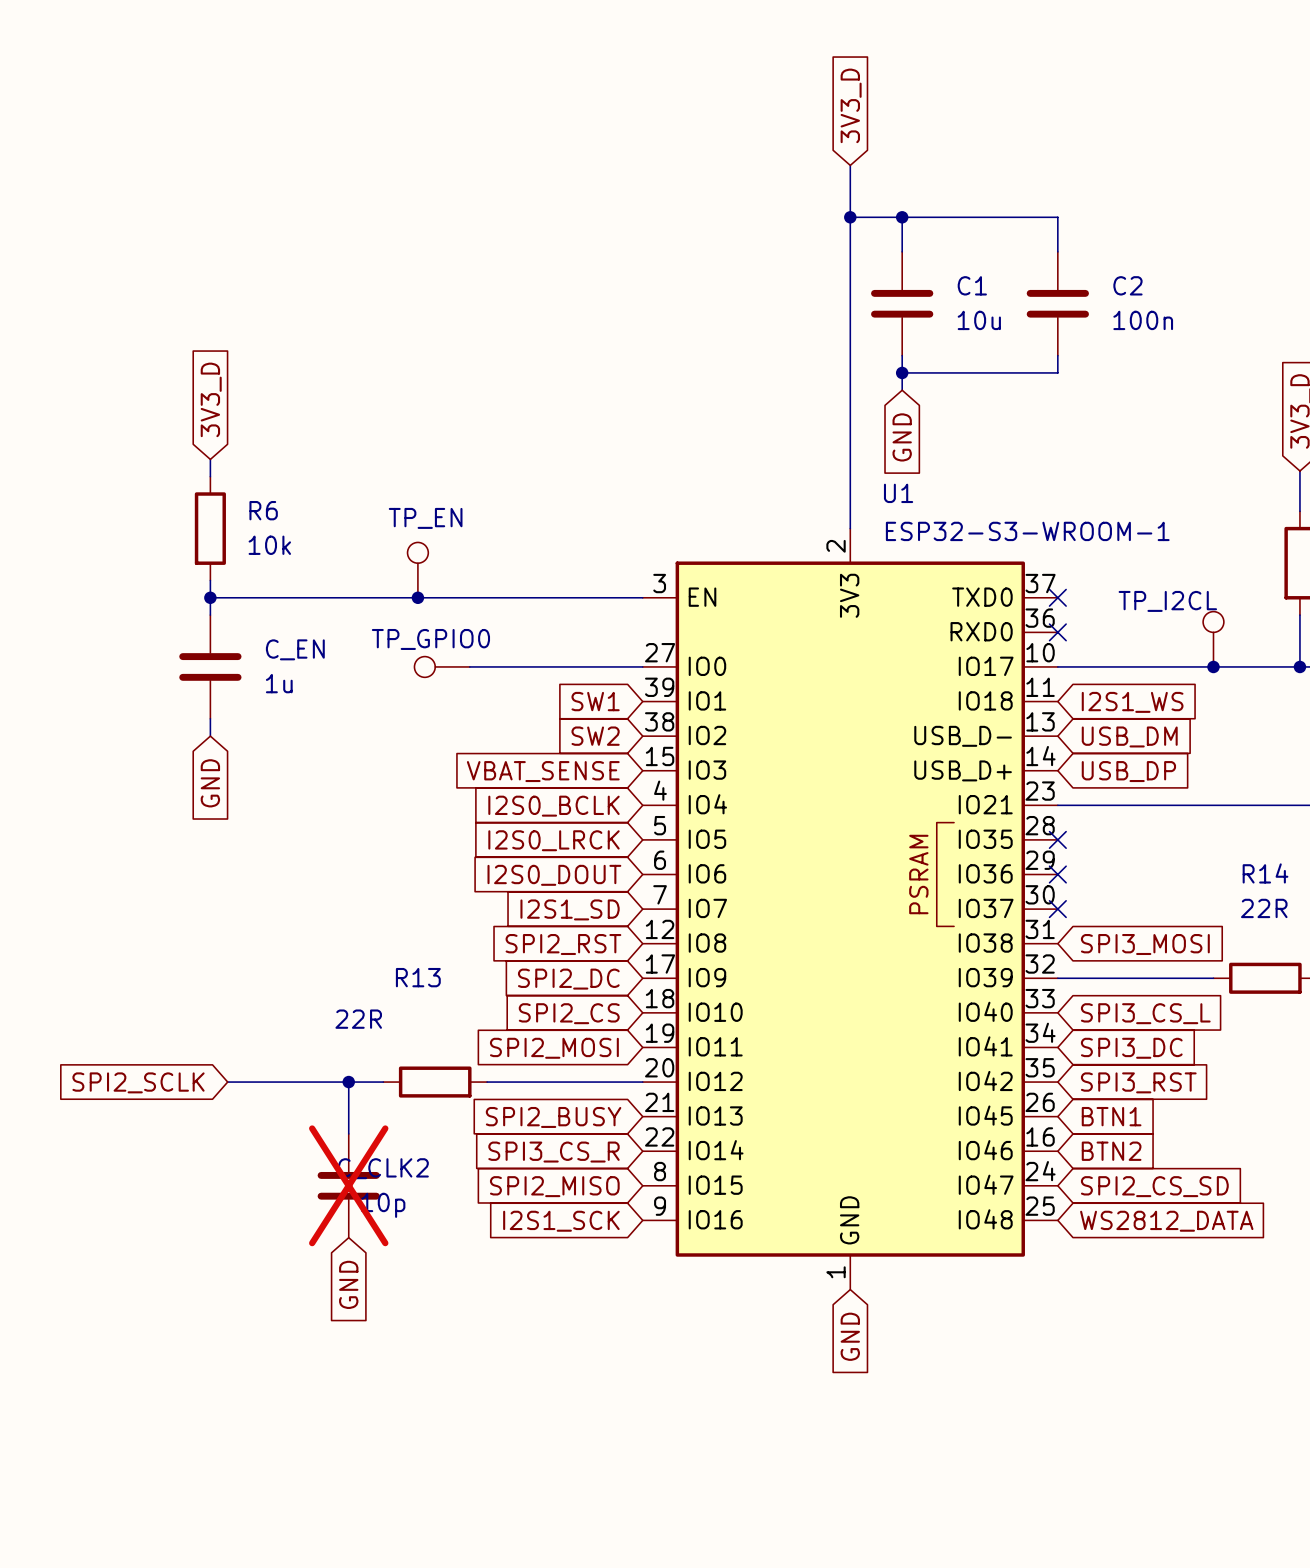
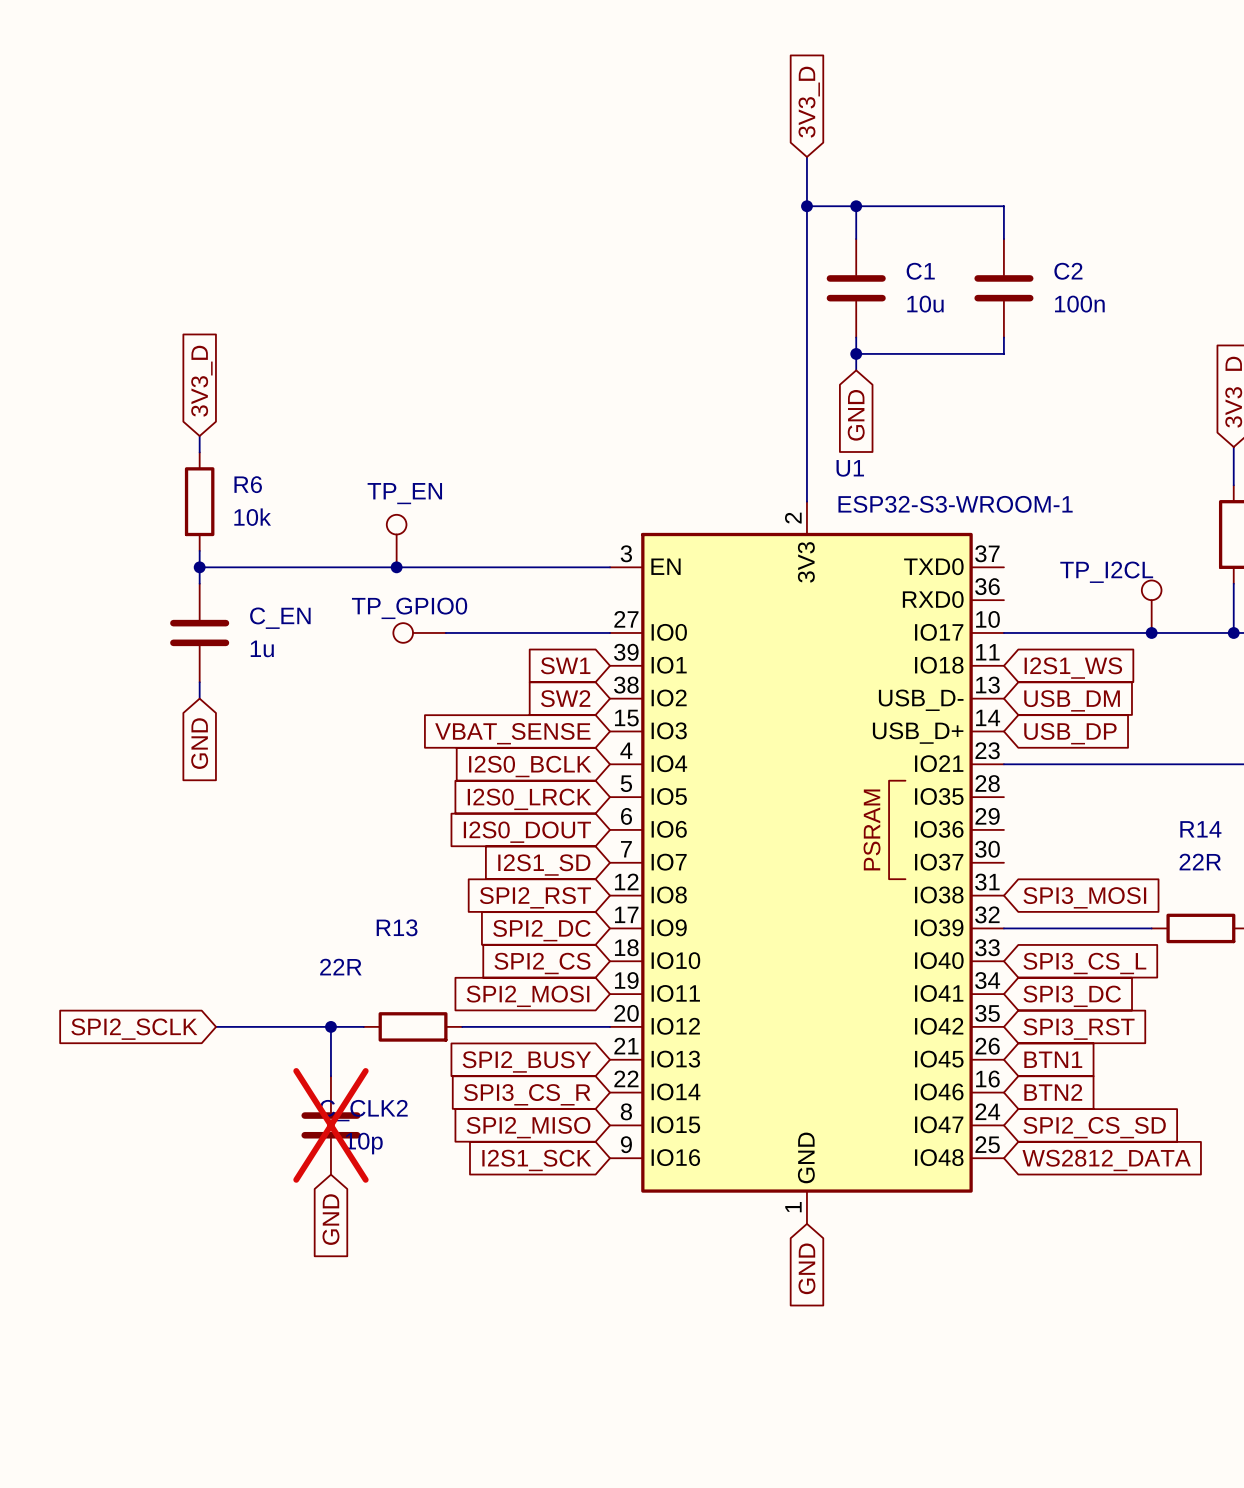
no-connect mark: (1057, 597) -> none
no-connect mark: (1057, 632) -> none
no-connect mark: (1057, 839) -> none
no-connect mark: (1057, 874) -> none
no-connect mark: (1057, 909) -> none

